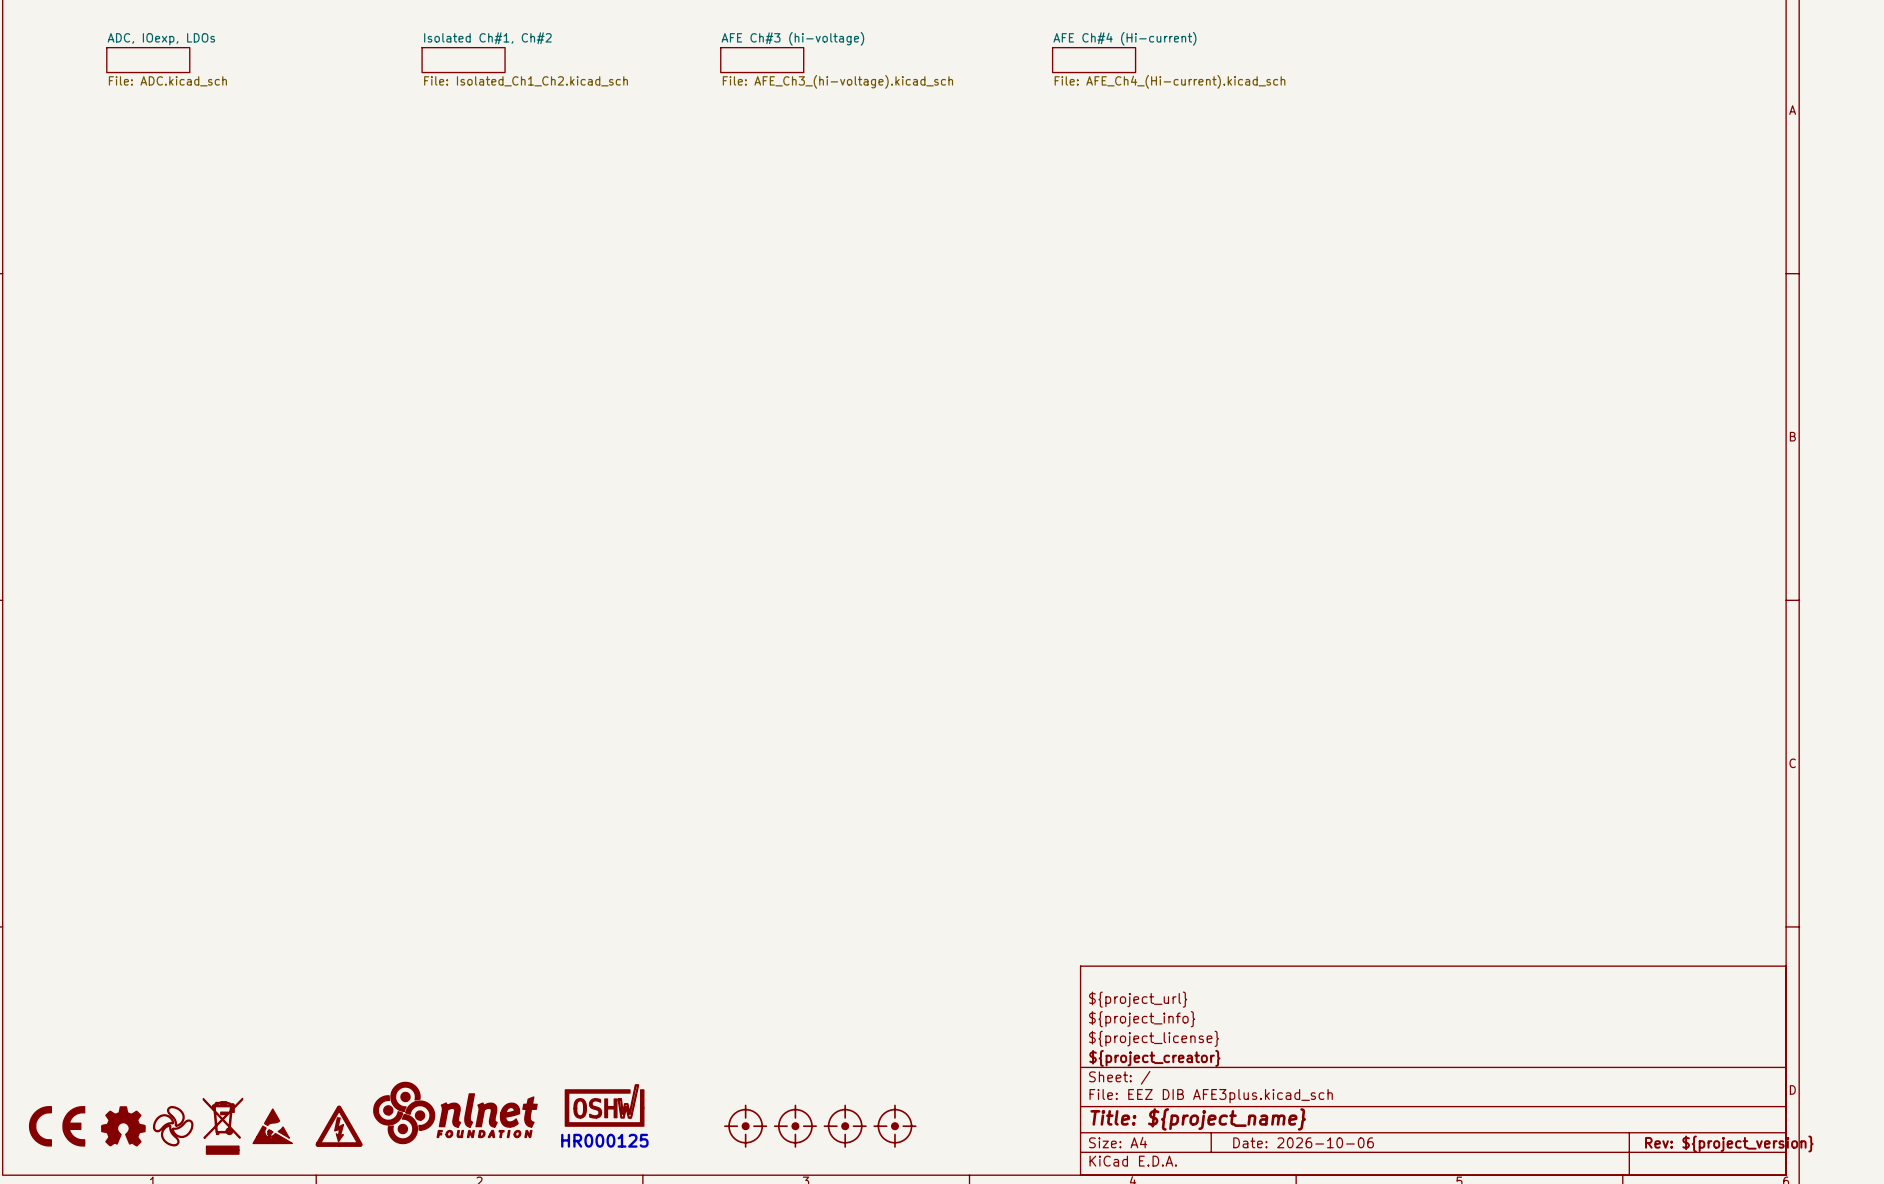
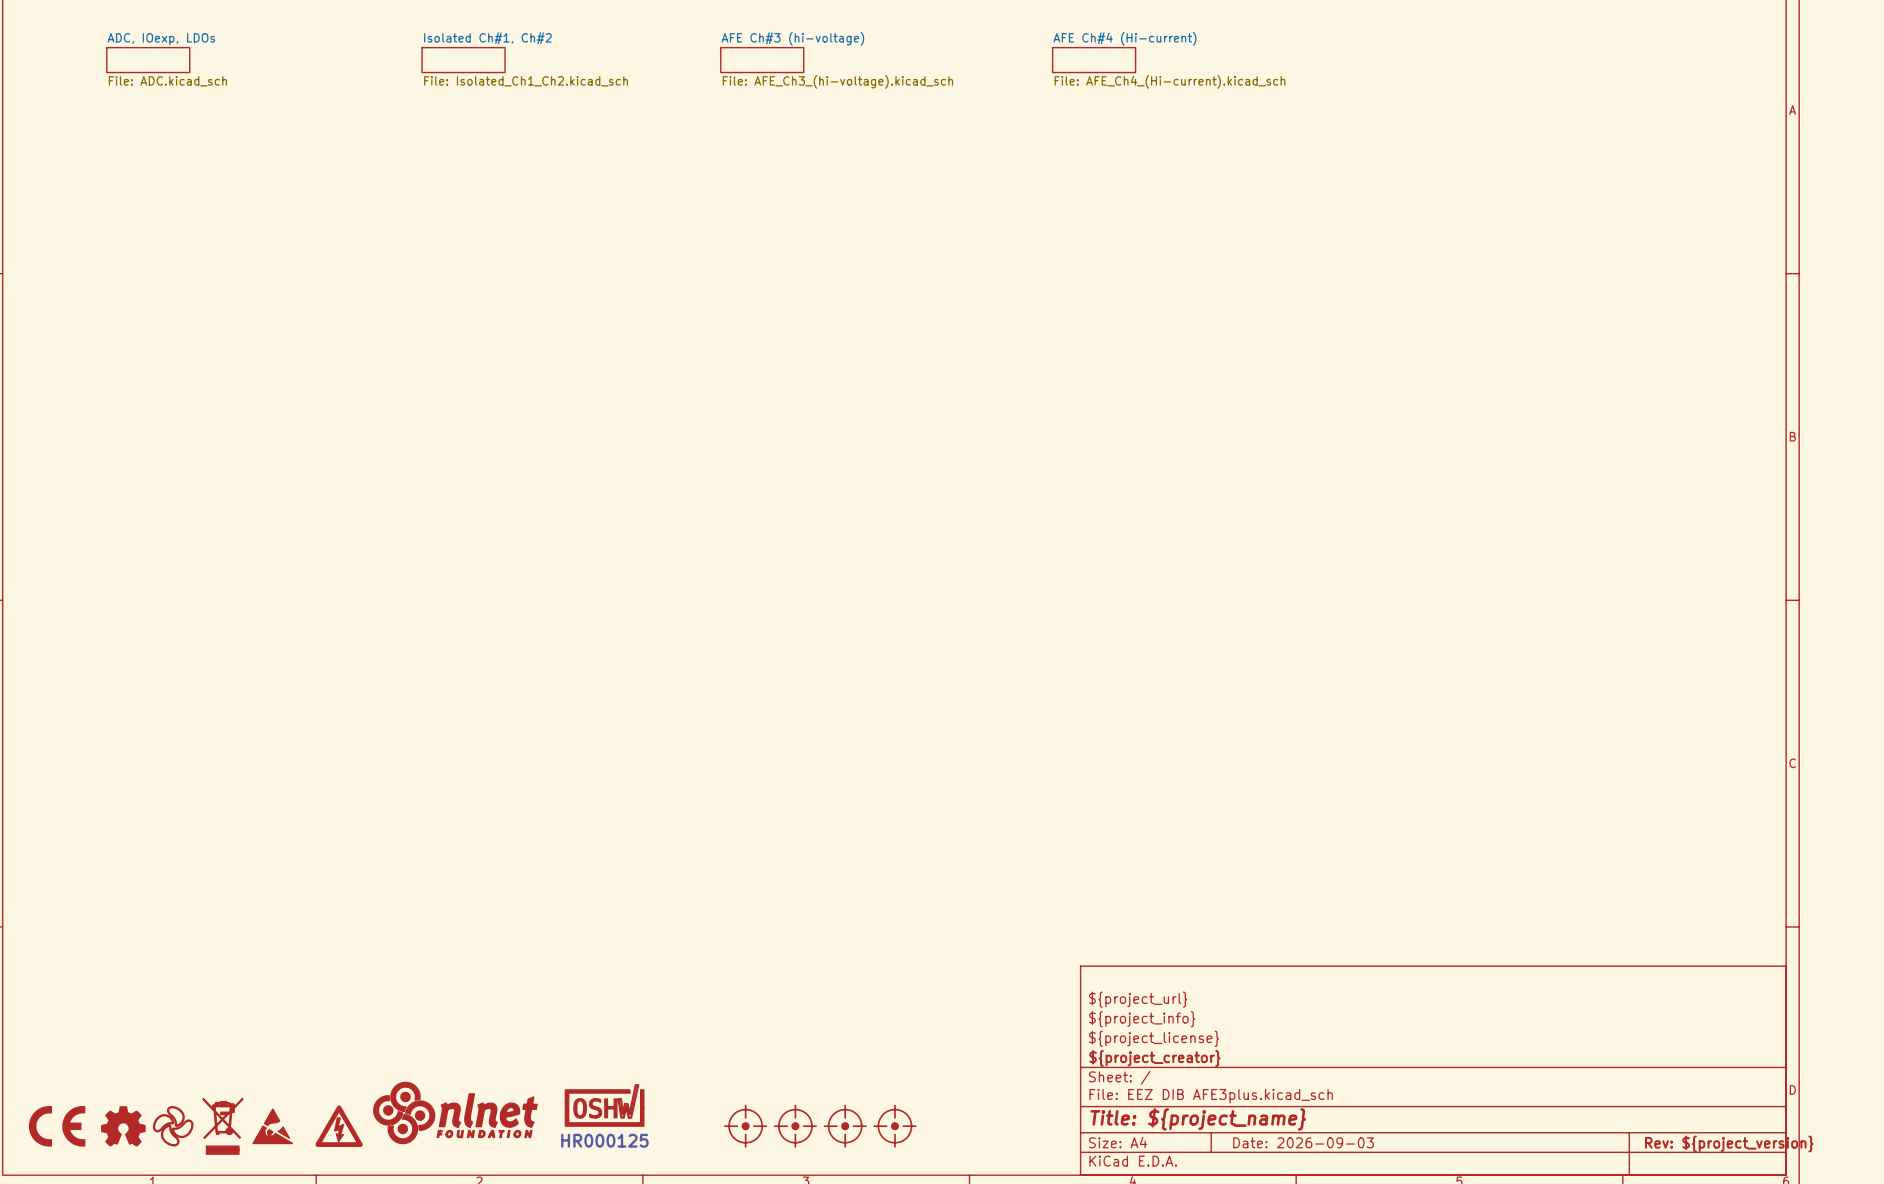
title block: Date: 2026-10-06 (1303, 1142) -> Date: 2026-09-03 (1303, 1142)

